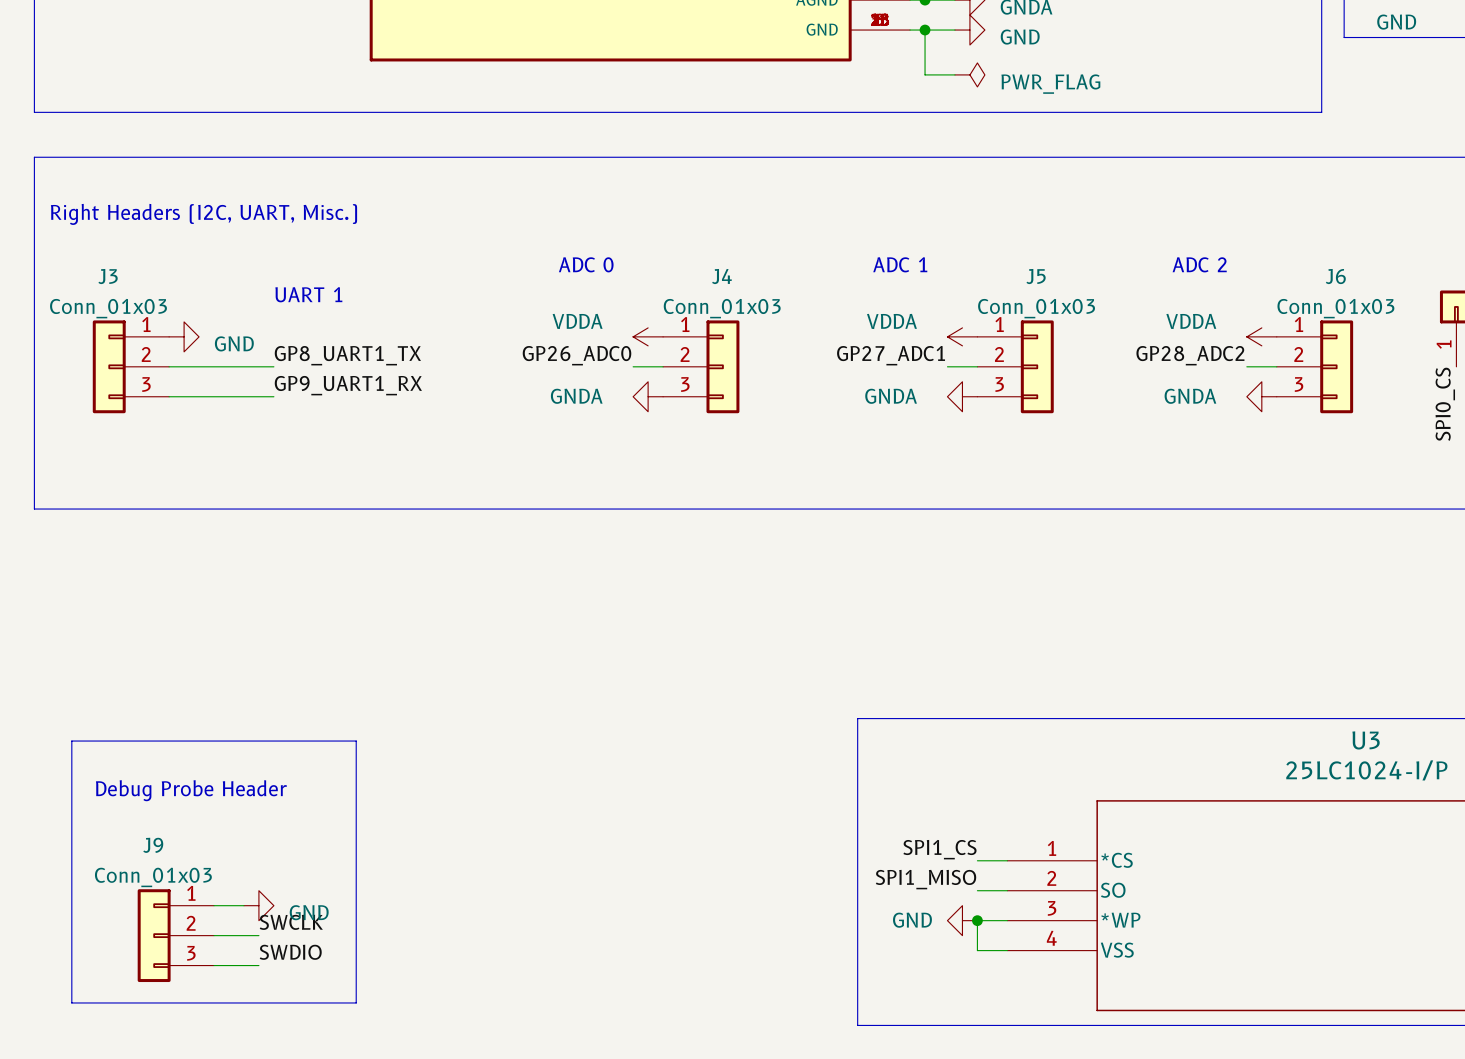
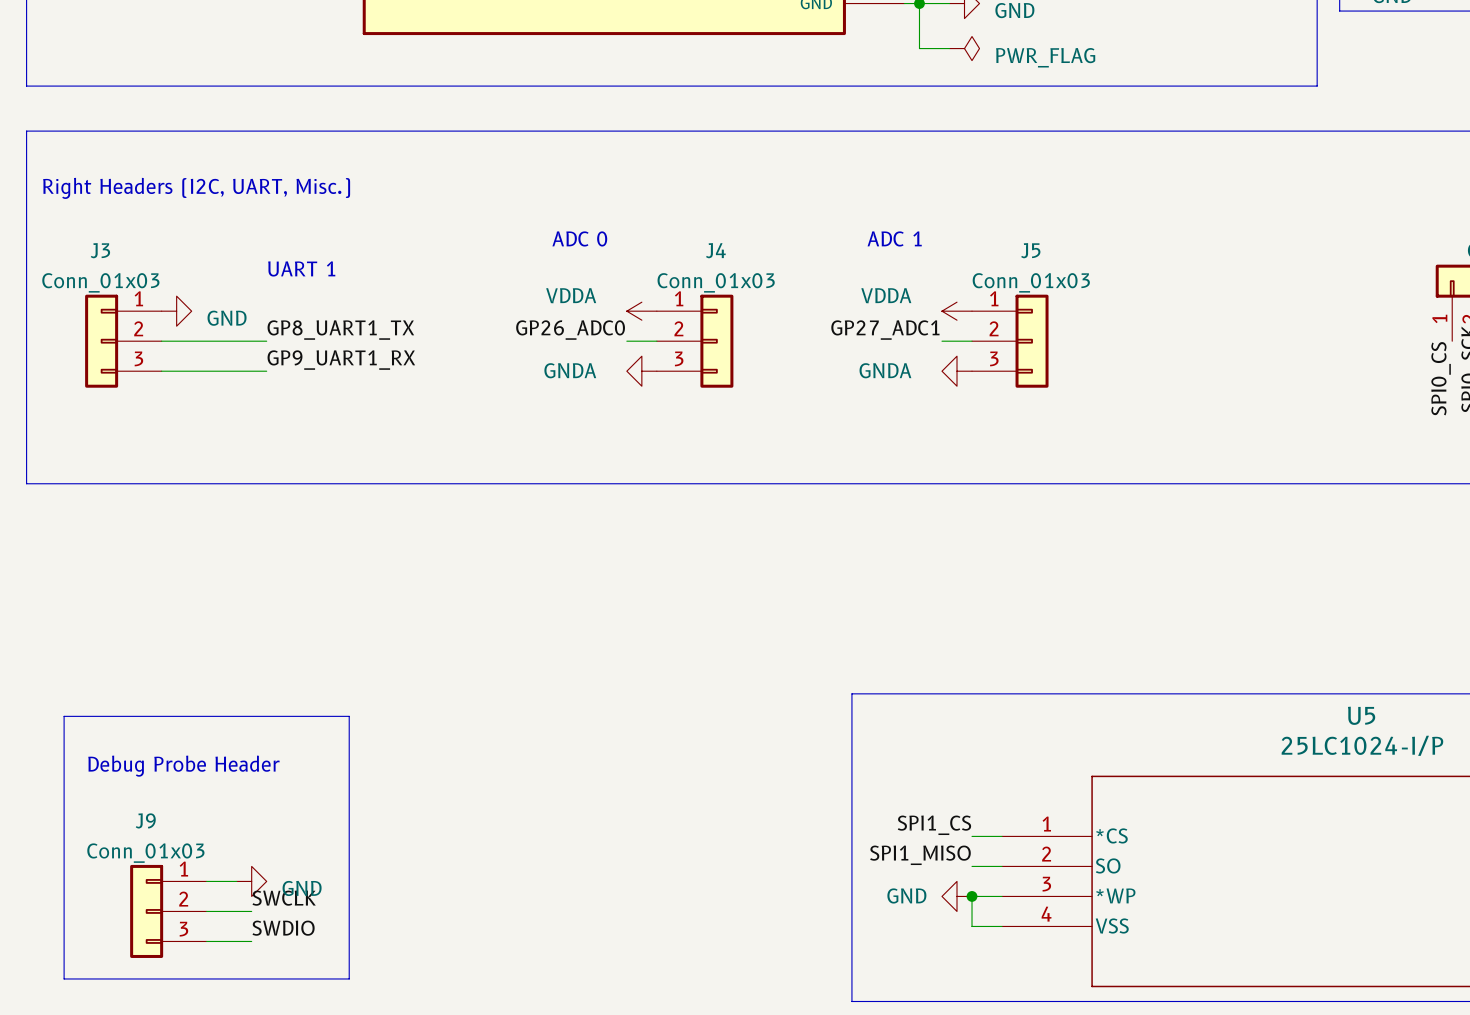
text: ADC 2 (1199, 264) -> none
power symbol: VDDA (1261, 336) -> none
label: GP28_ADC2 (1190, 355) -> none
wire: (1246, 366) (1276, 366) -> none
J6: Conn_01x03 (1314, 366) -> none
power symbol: GNDA (1261, 396) -> none
U3 name: U3 (1366, 740) -> U5 (1361, 715)

